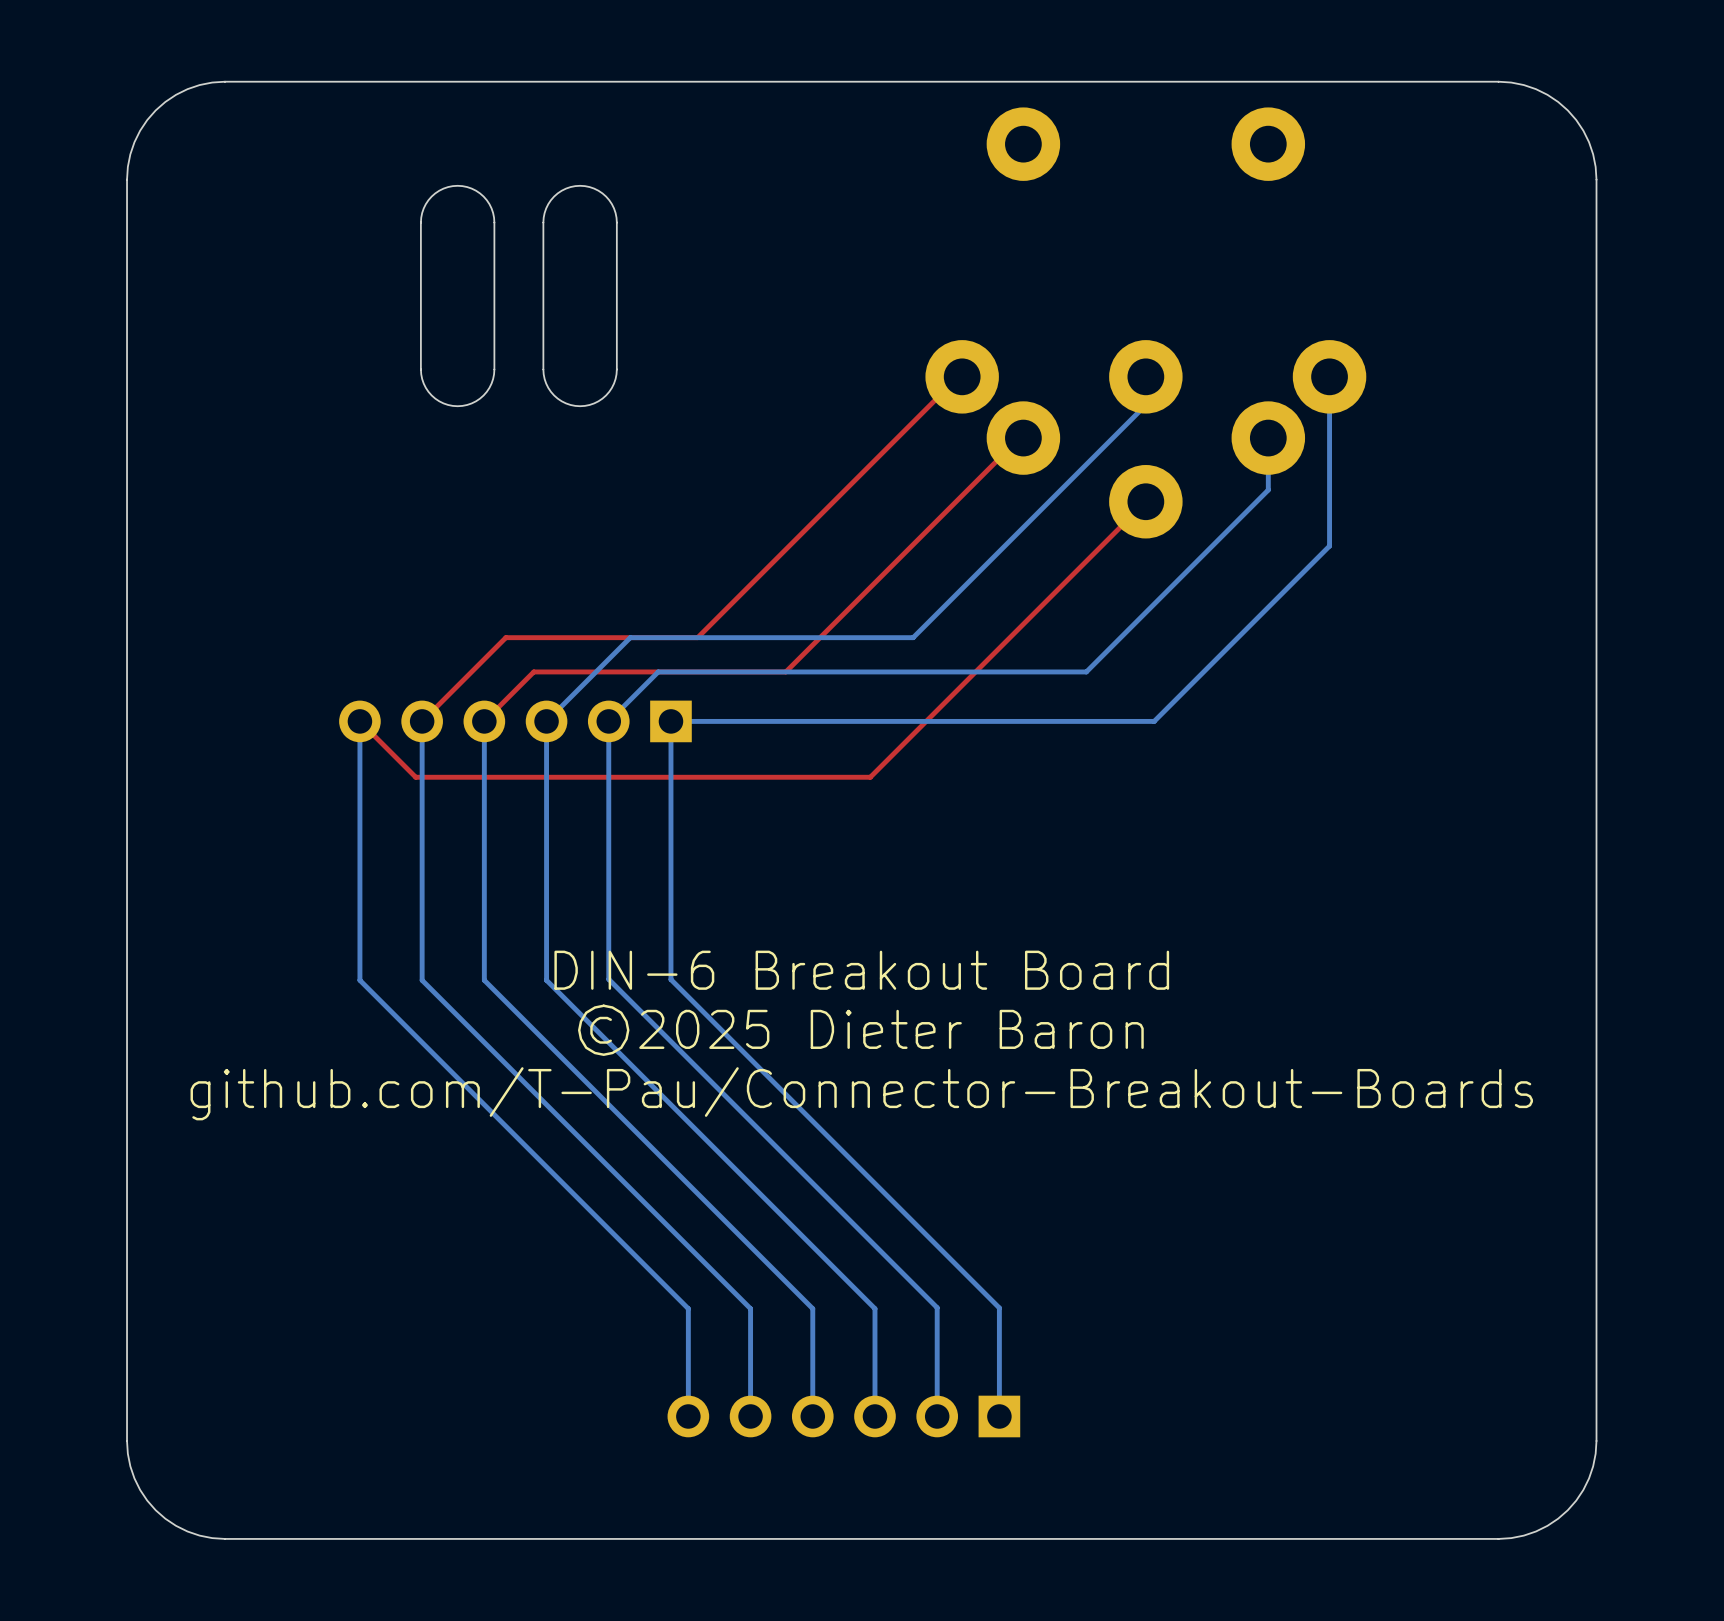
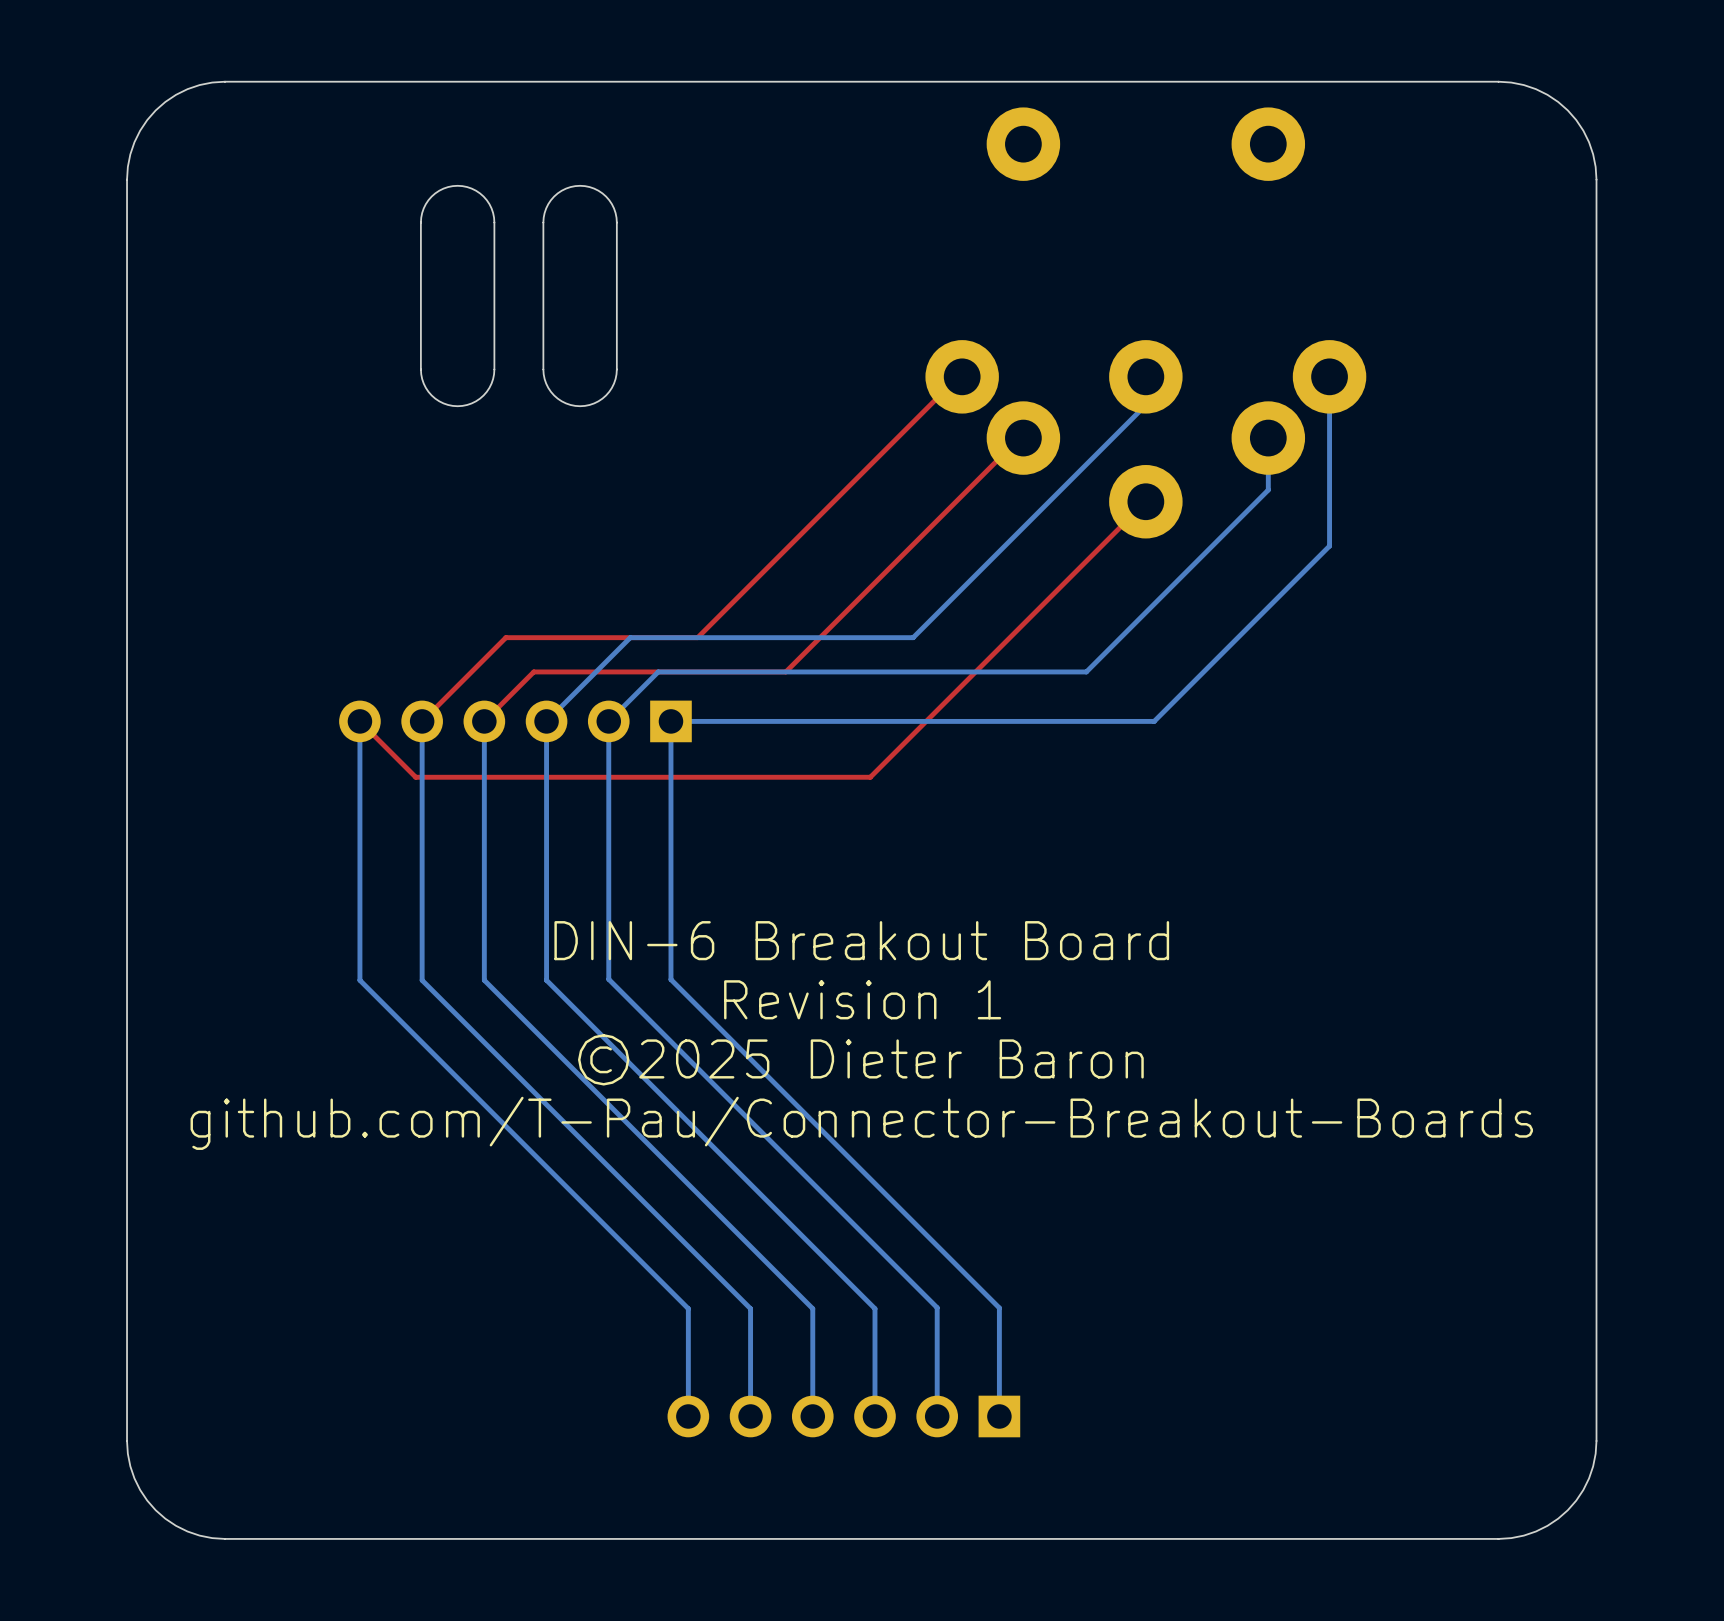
text position: DIN-6 Breakout Board (861, 970) -> DIN-6 Breakout Board (861, 940)
text: none -> Revision 1 (862, 999)
text position: ©2025 Dieter Baron (860, 1030) -> ©2025 Dieter Baron (860, 1059)
text position: github.com/T-Pau/Connector-Breakout-Boards (861, 1093) -> github.com/T-Pau/Connector-Breakout-Boards (861, 1123)

